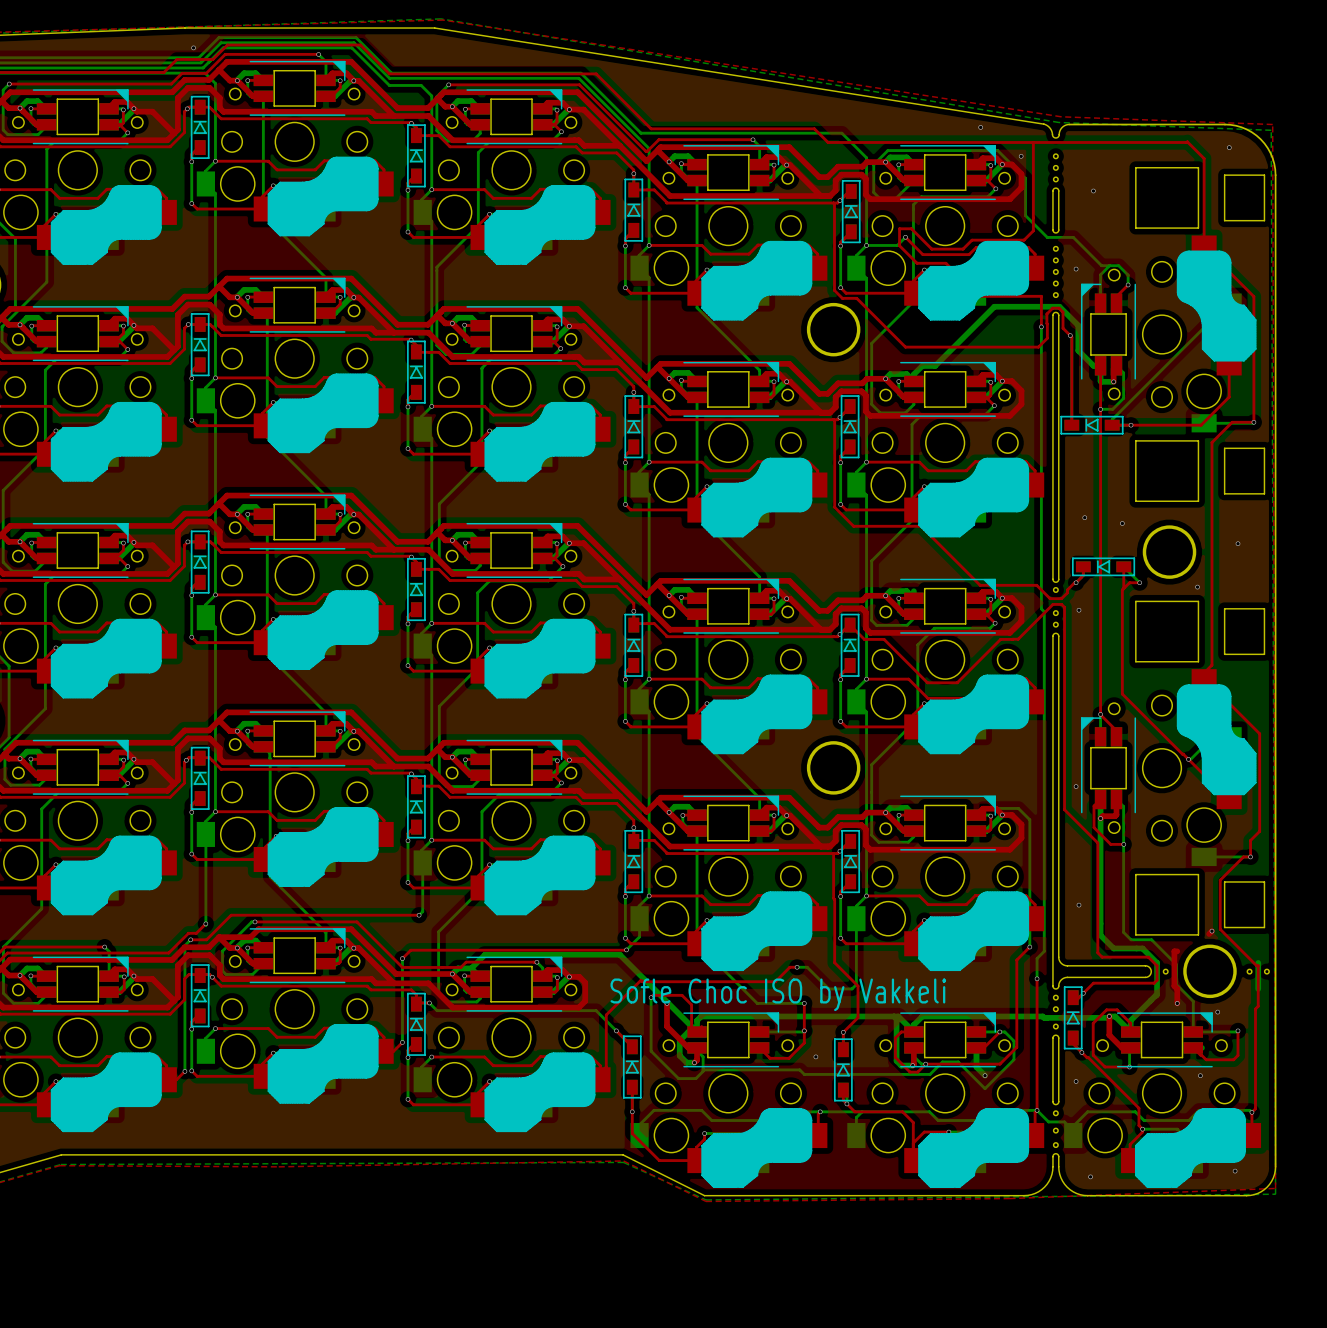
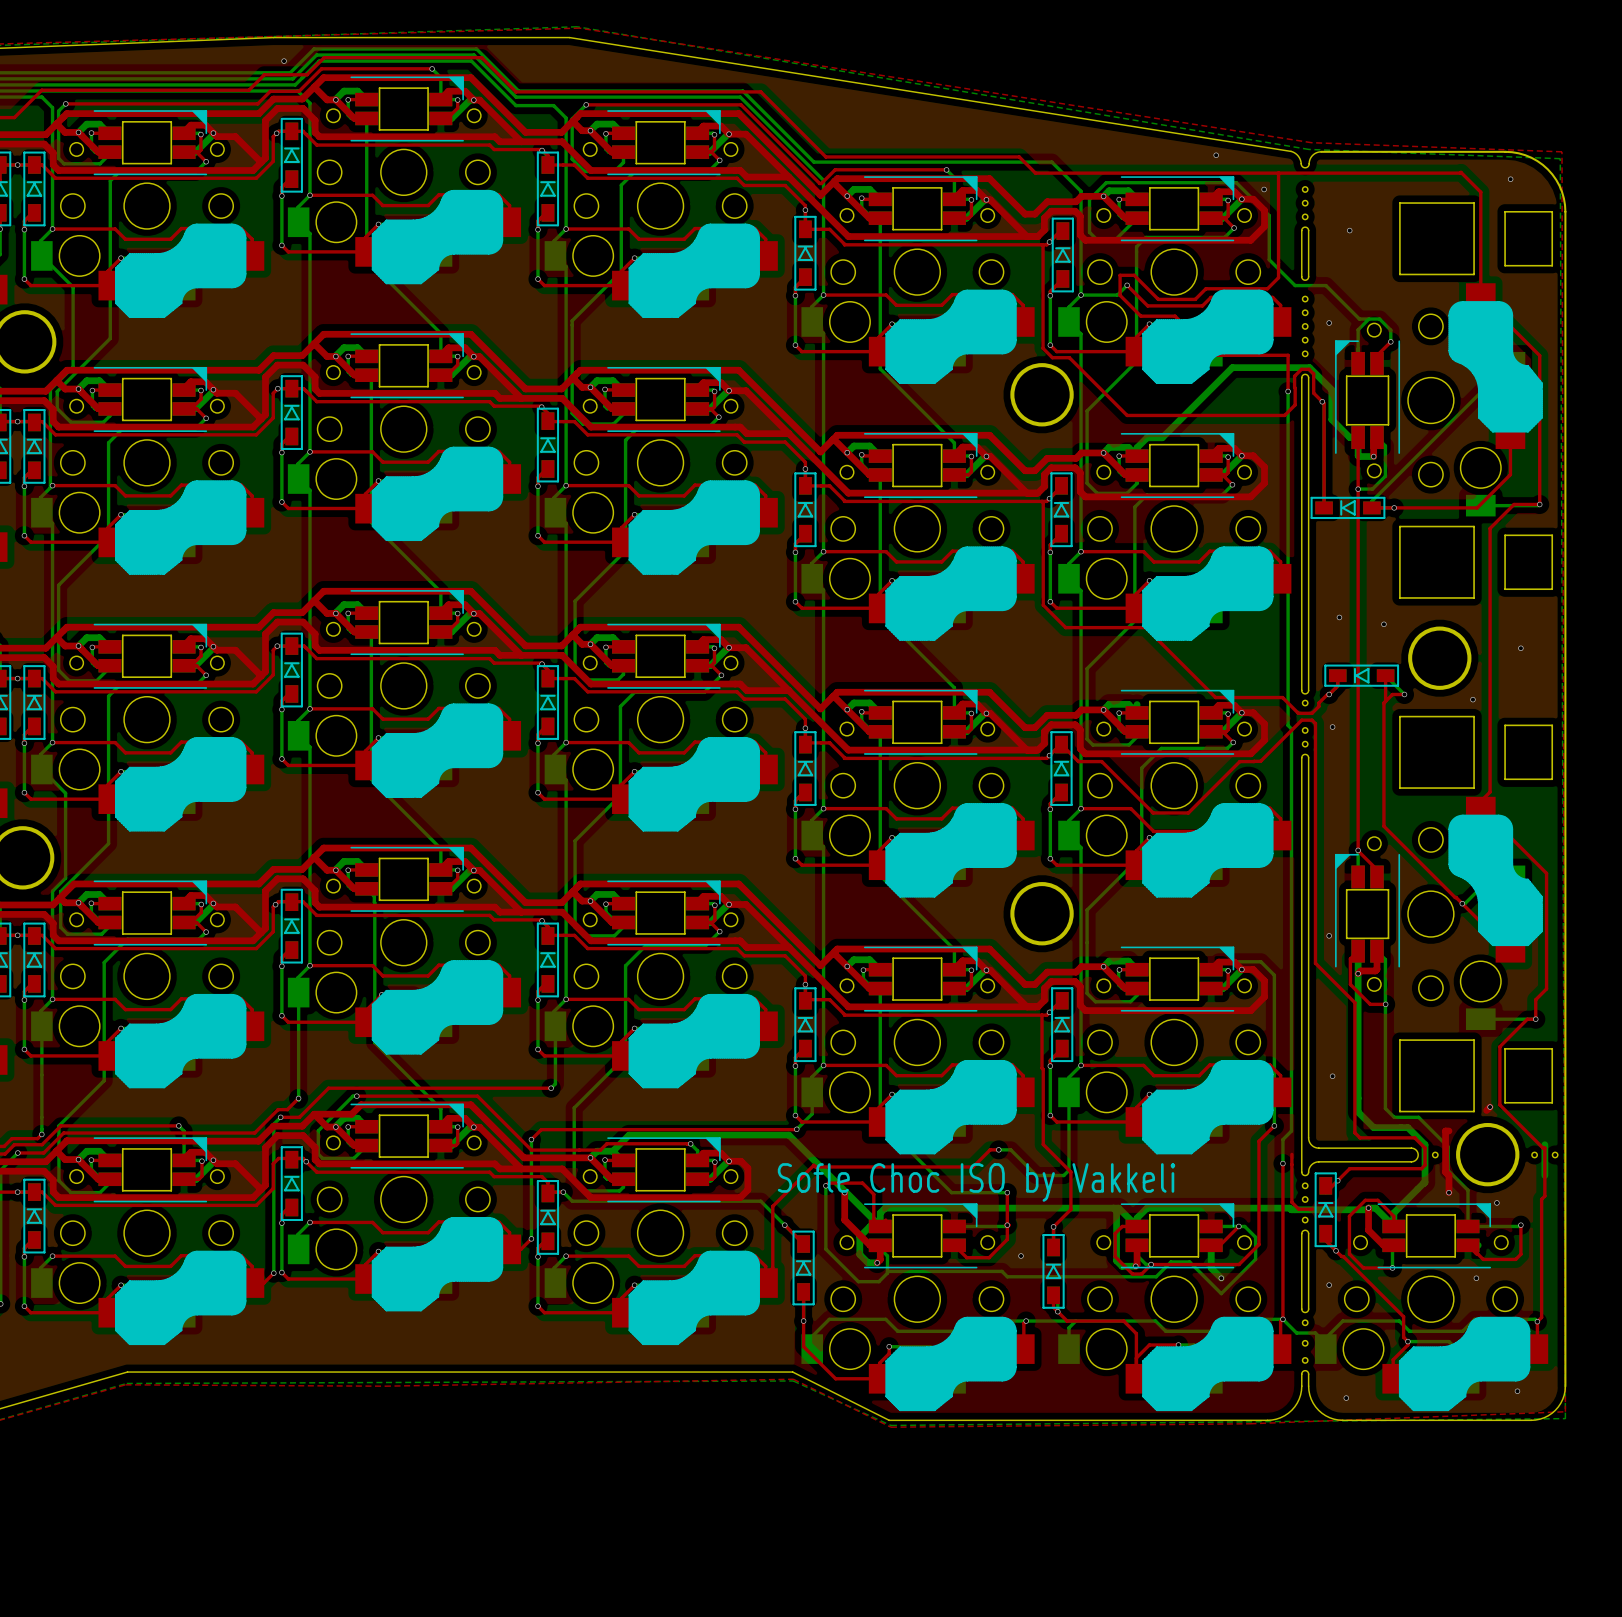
top track: none -> (1291, 1154) (1291, 1202) (1298, 1209) (1312, 1209)

